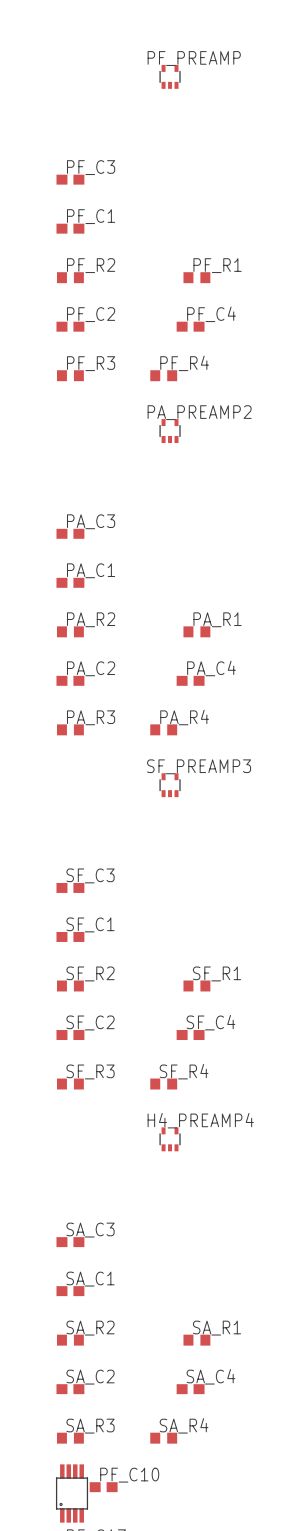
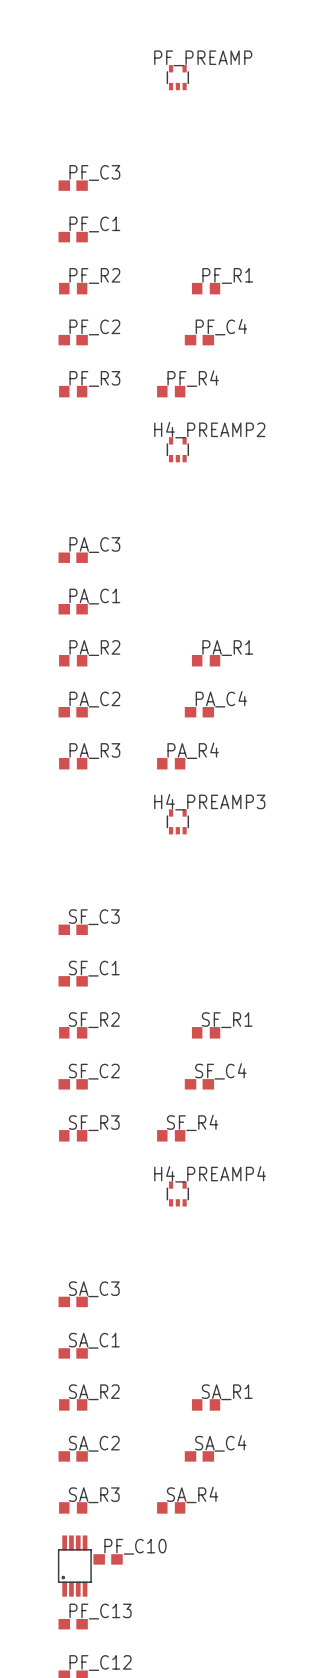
PA_PREAMP2 name: PA_PREAMP2 (199, 412) -> H4_PREAMP2 (209, 430)
SF_PREAMP3 name: SF_PREAMP3 (199, 766) -> H4_PREAMP3 (209, 802)

